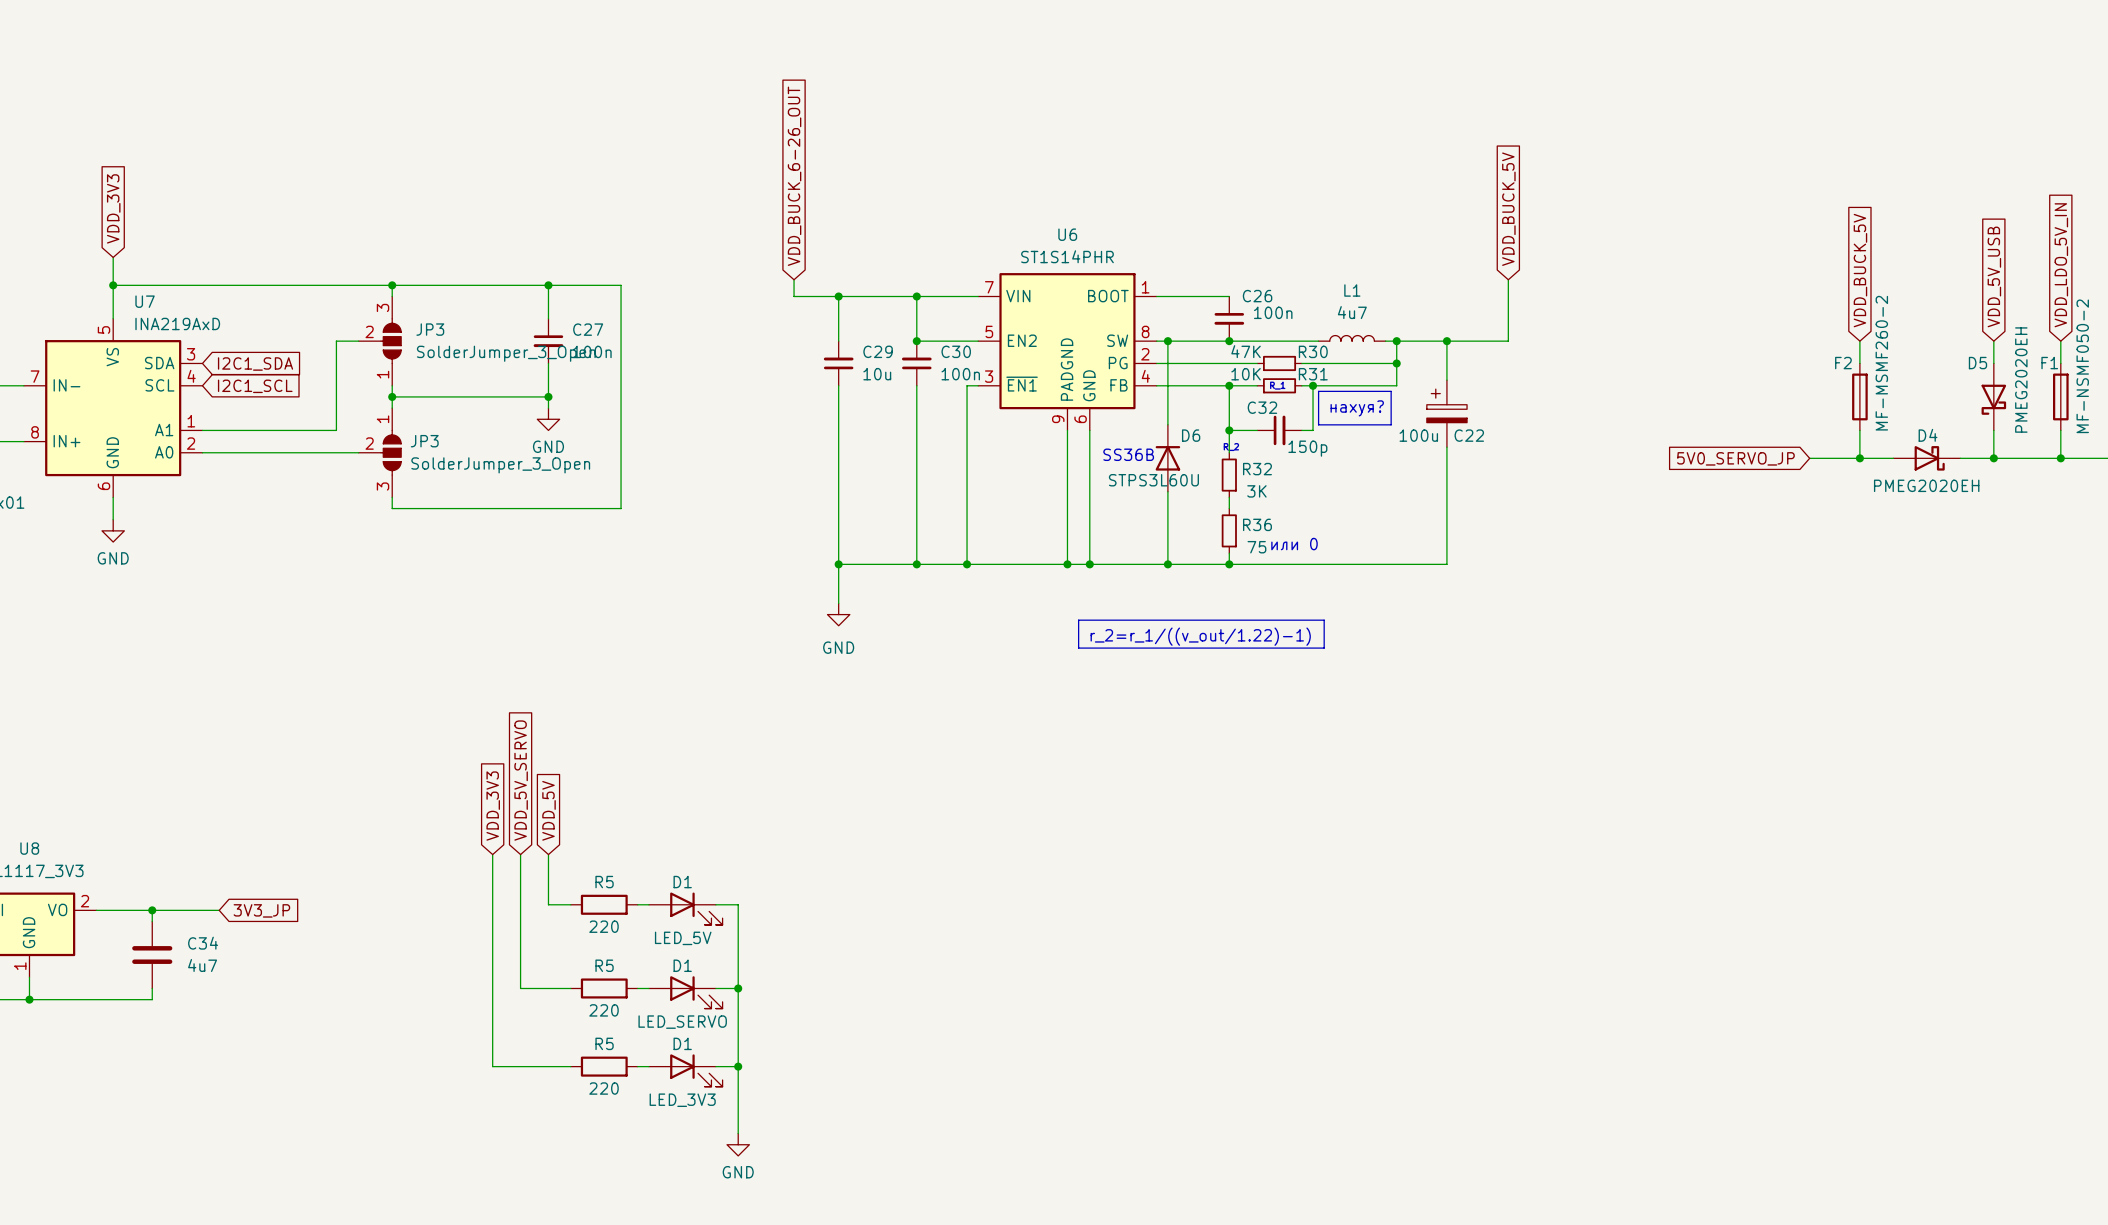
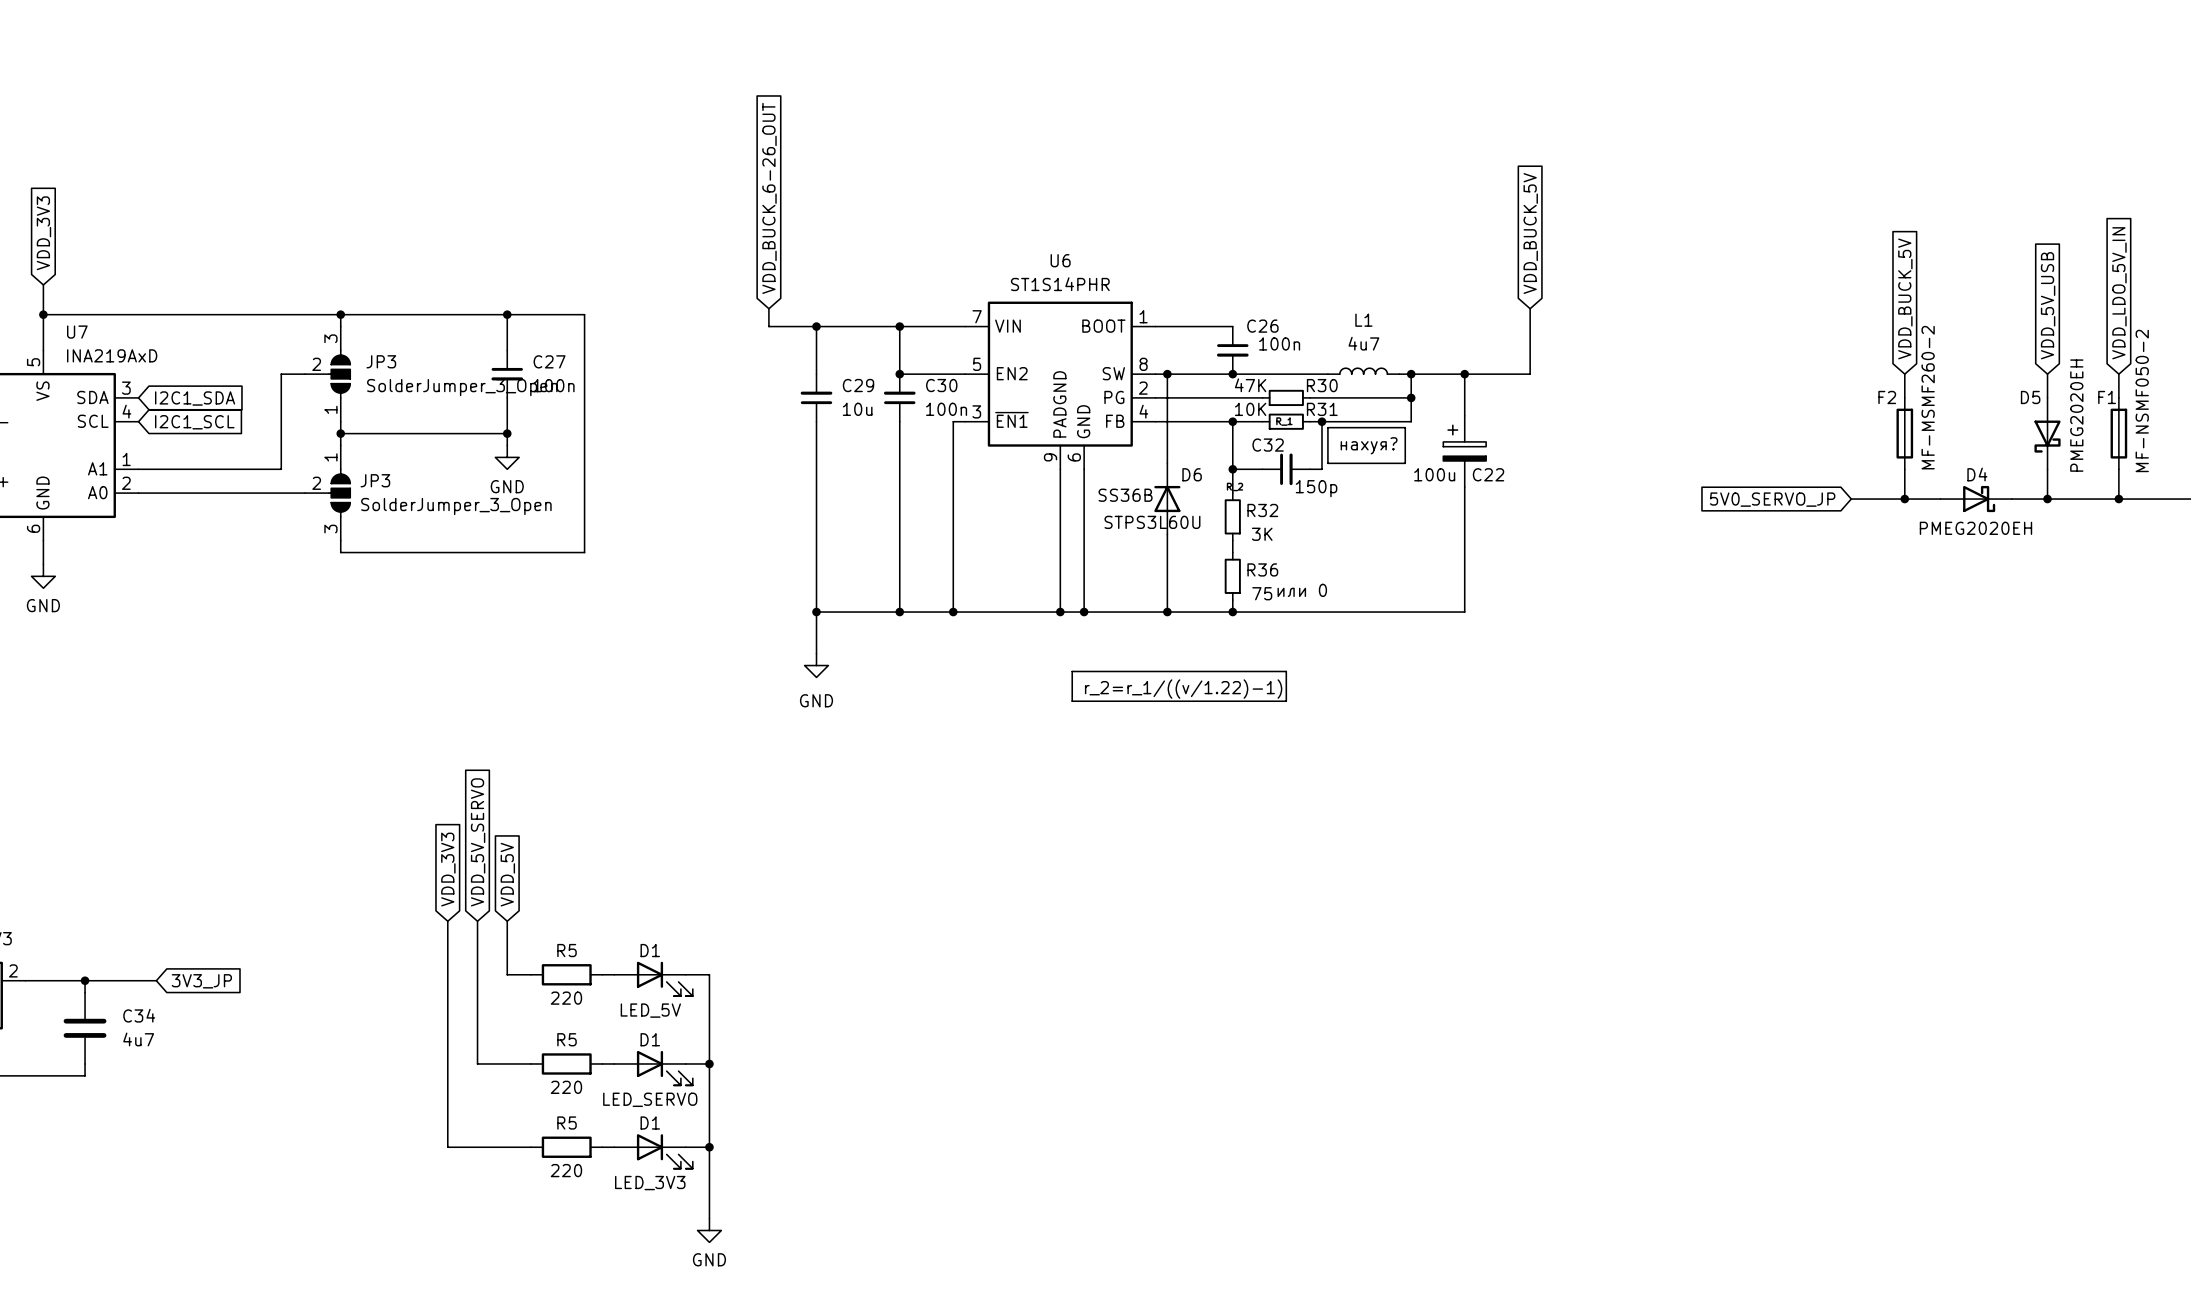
line: (1279, 620) (1324, 620) (1324, 648) (1279, 648) -> (1286, 671) (1286, 701)
text: r_2=r_1/((v_out/1.22)-1) (1200, 636) -> r_2=r_1/((v/1.22)-1) (1183, 689)

